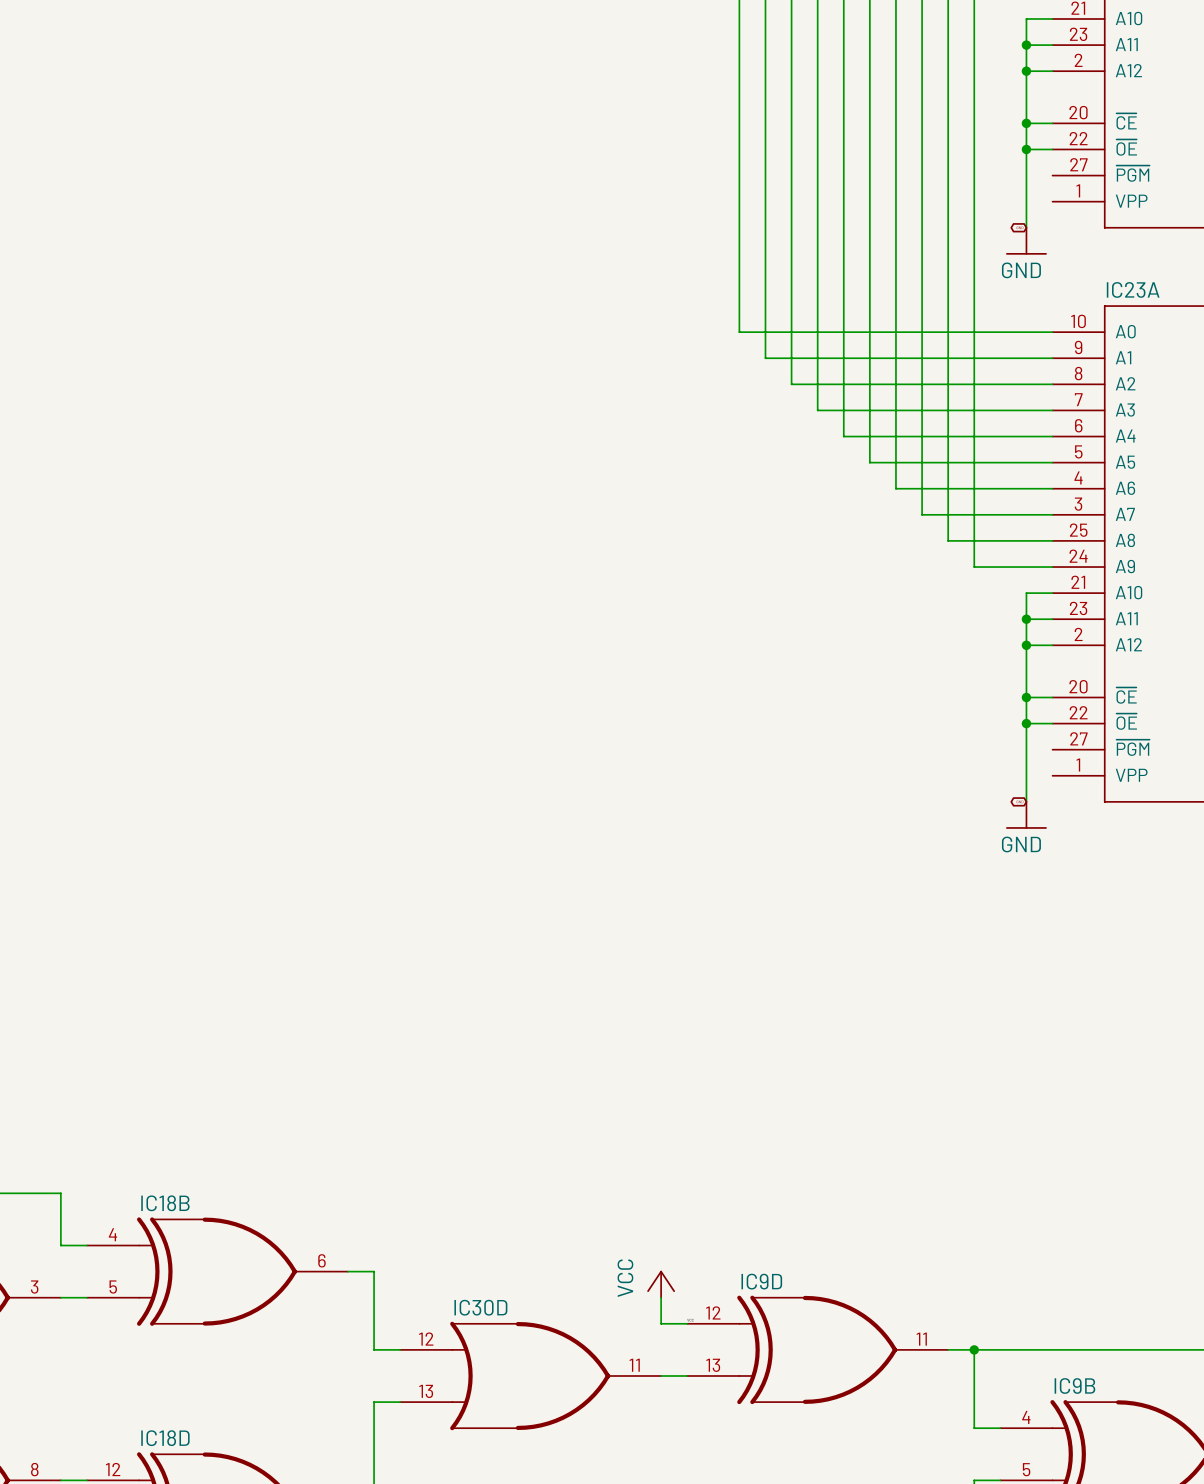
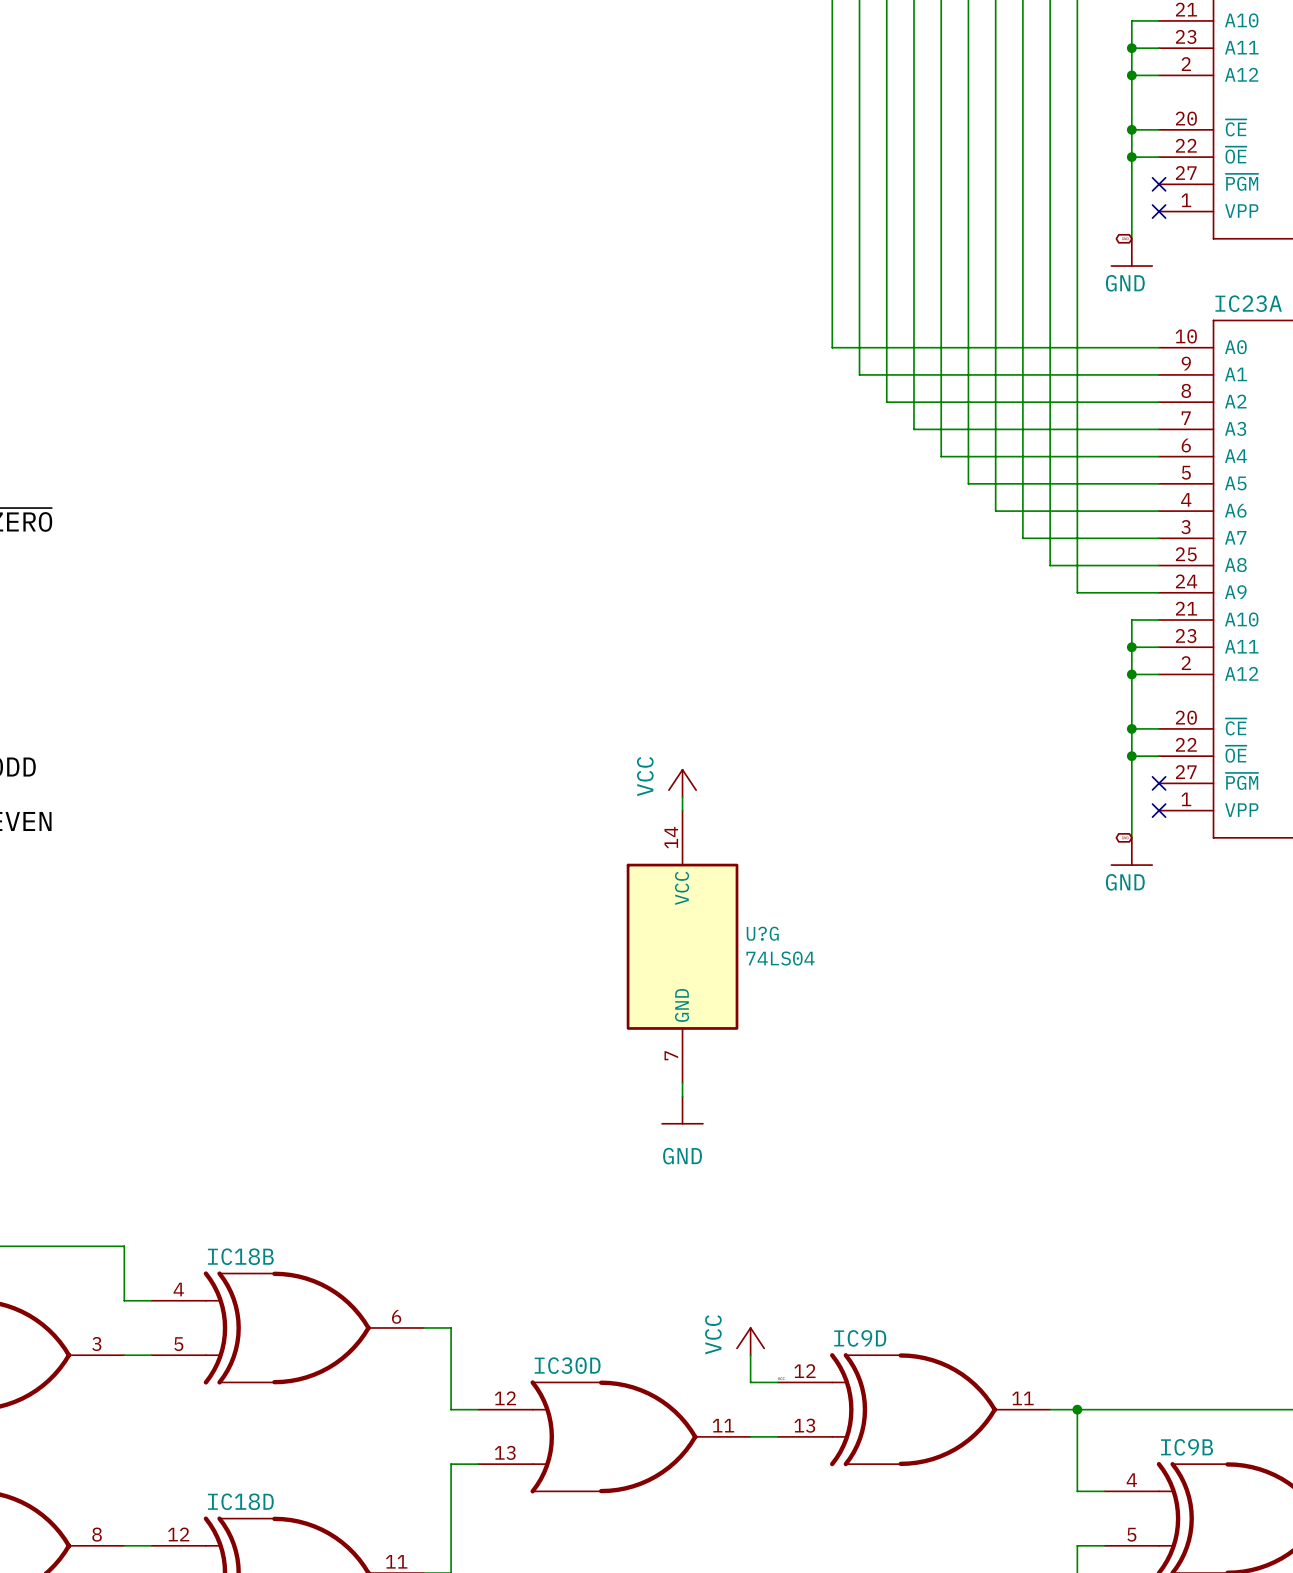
no-connect mark: none -> (1159, 184)
no-connect mark: none -> (1159, 211)
power symbol: none -> VCC (682, 783)
no-connect mark: none -> (1159, 783)
wire: none -> (682, 797) (682, 810)
no-connect mark: none -> (1159, 810)
U?G: none -> 74LS04 (682, 946)
wire: none -> (682, 1082) (682, 1096)
power symbol: none -> GND (682, 1110)

